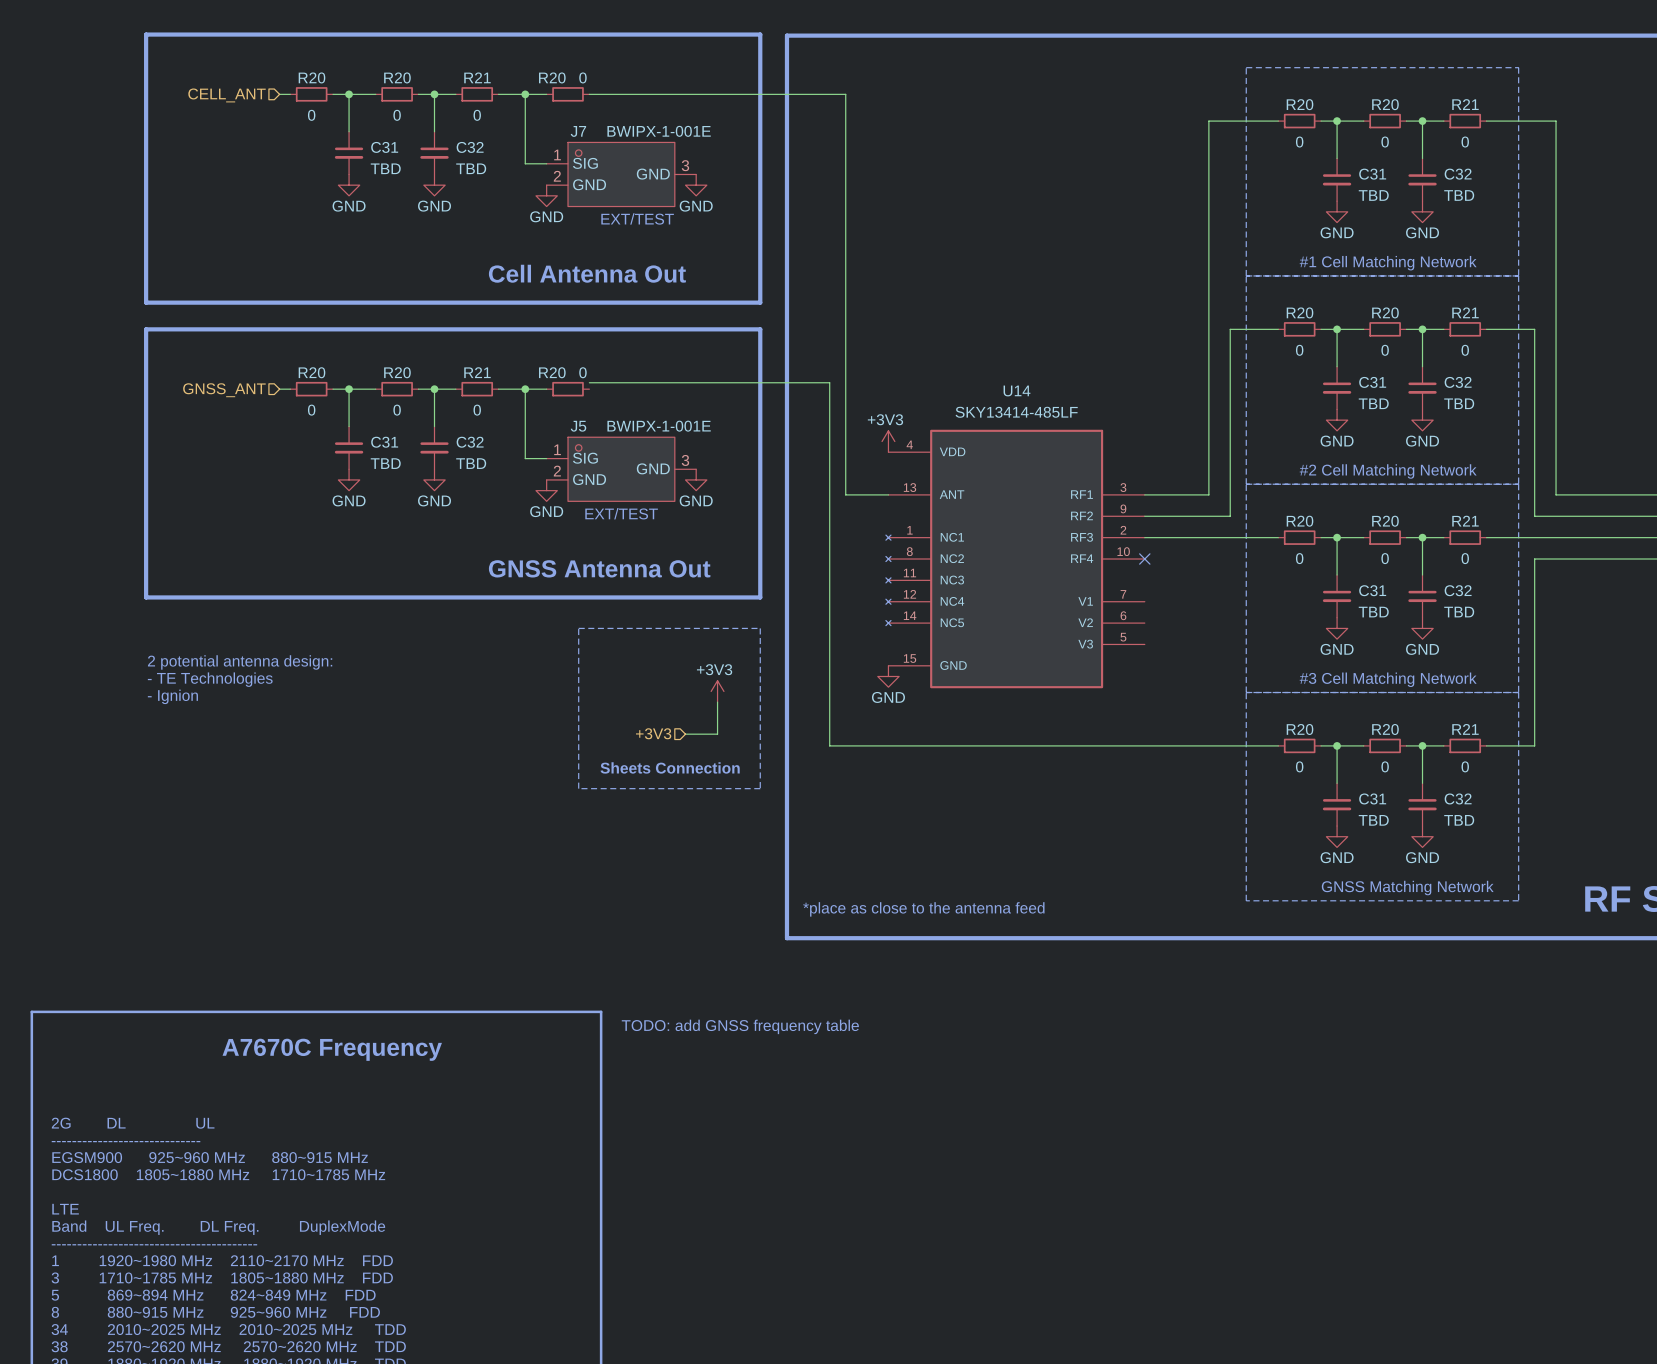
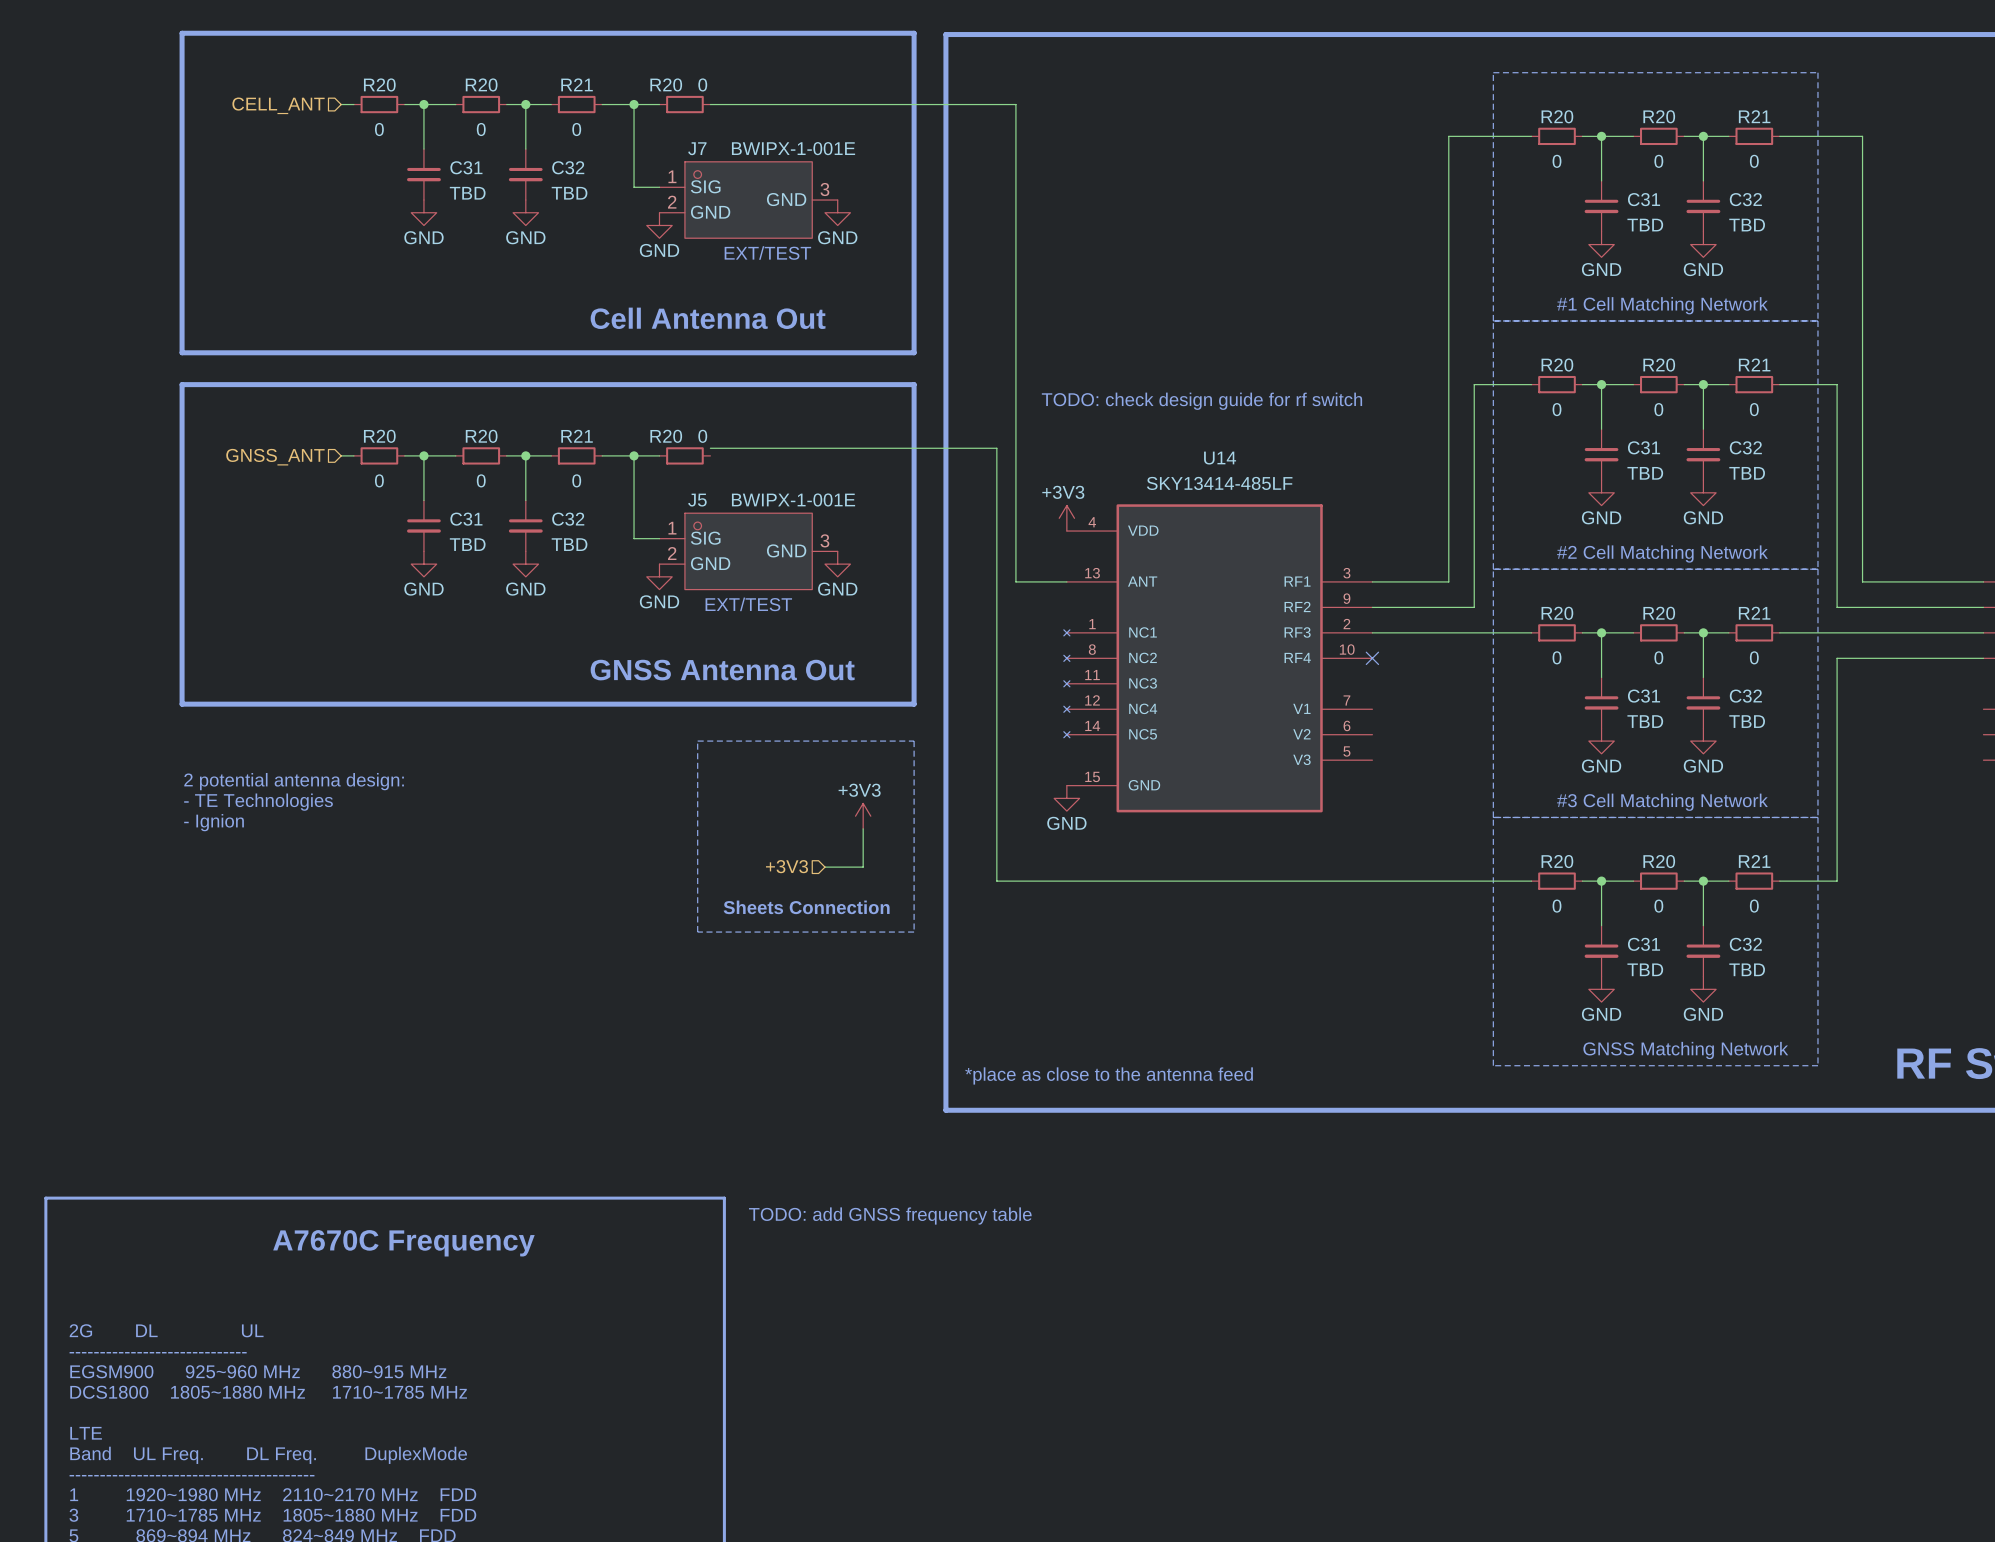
text: none -> TODO: check design guide for rf switch (1201, 401)

